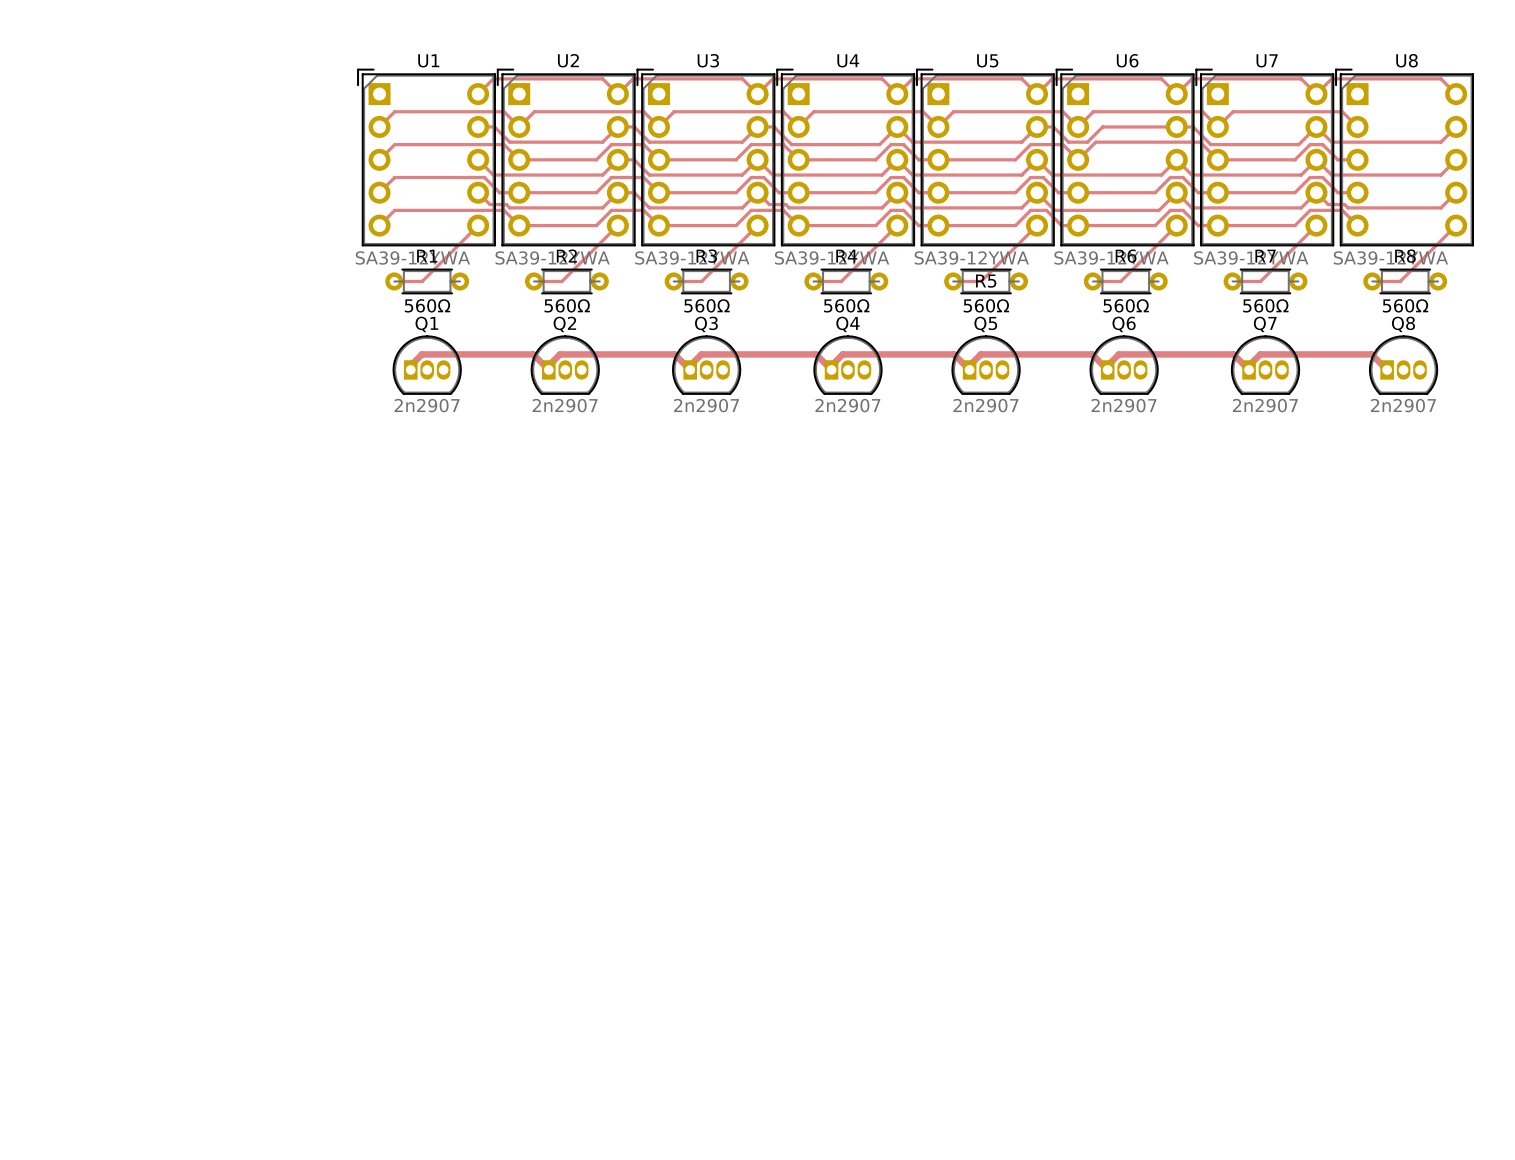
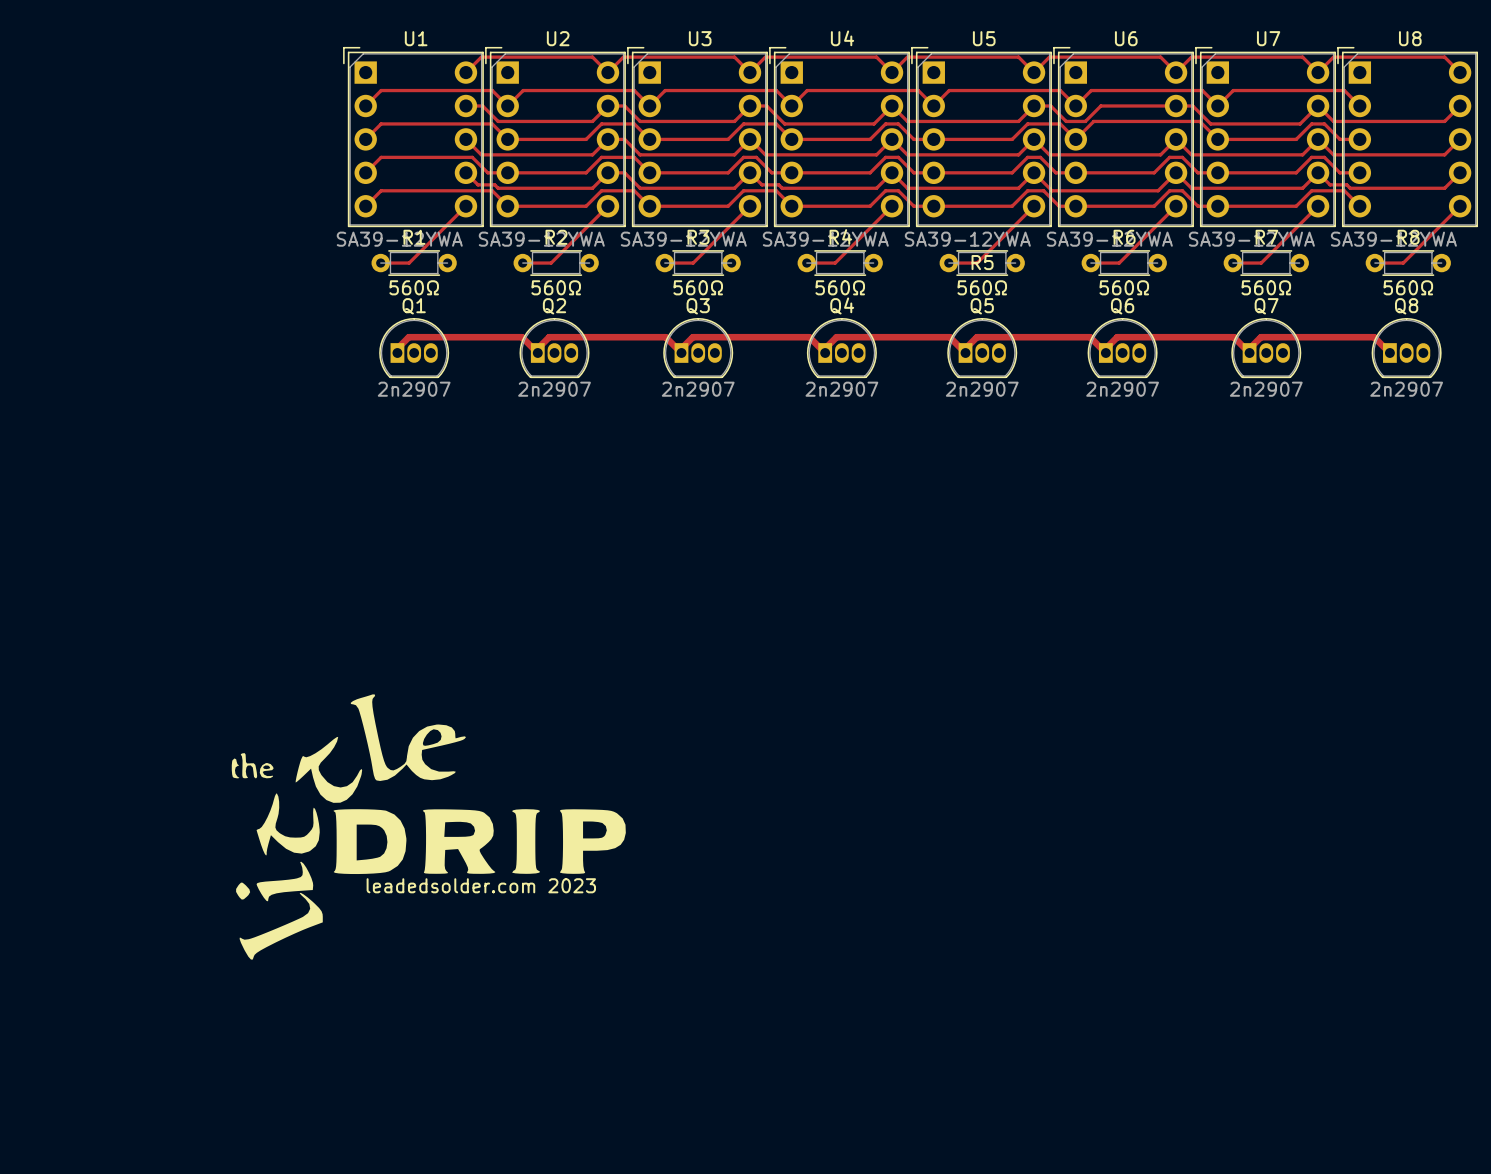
drawing: none -> [231, 694, 626, 960]
text: none -> leadedsolder.com 2023 (481, 885)

